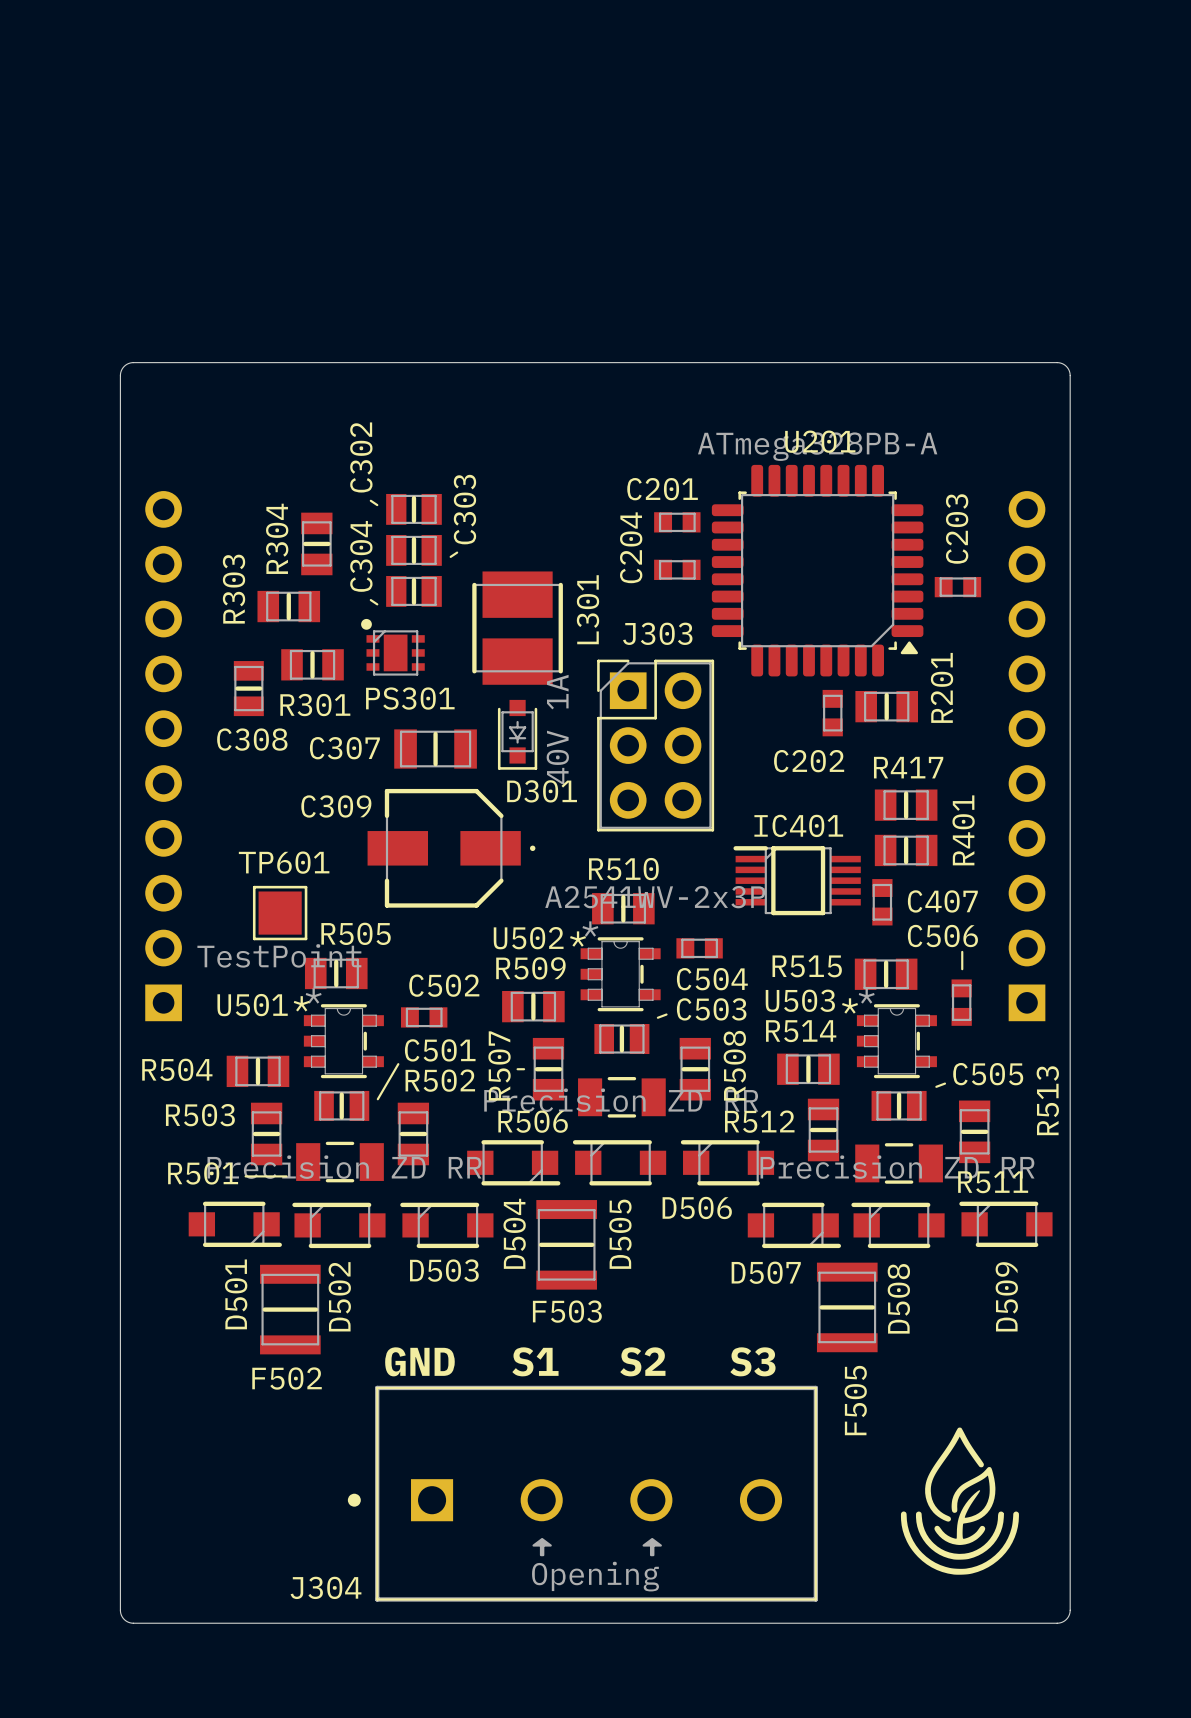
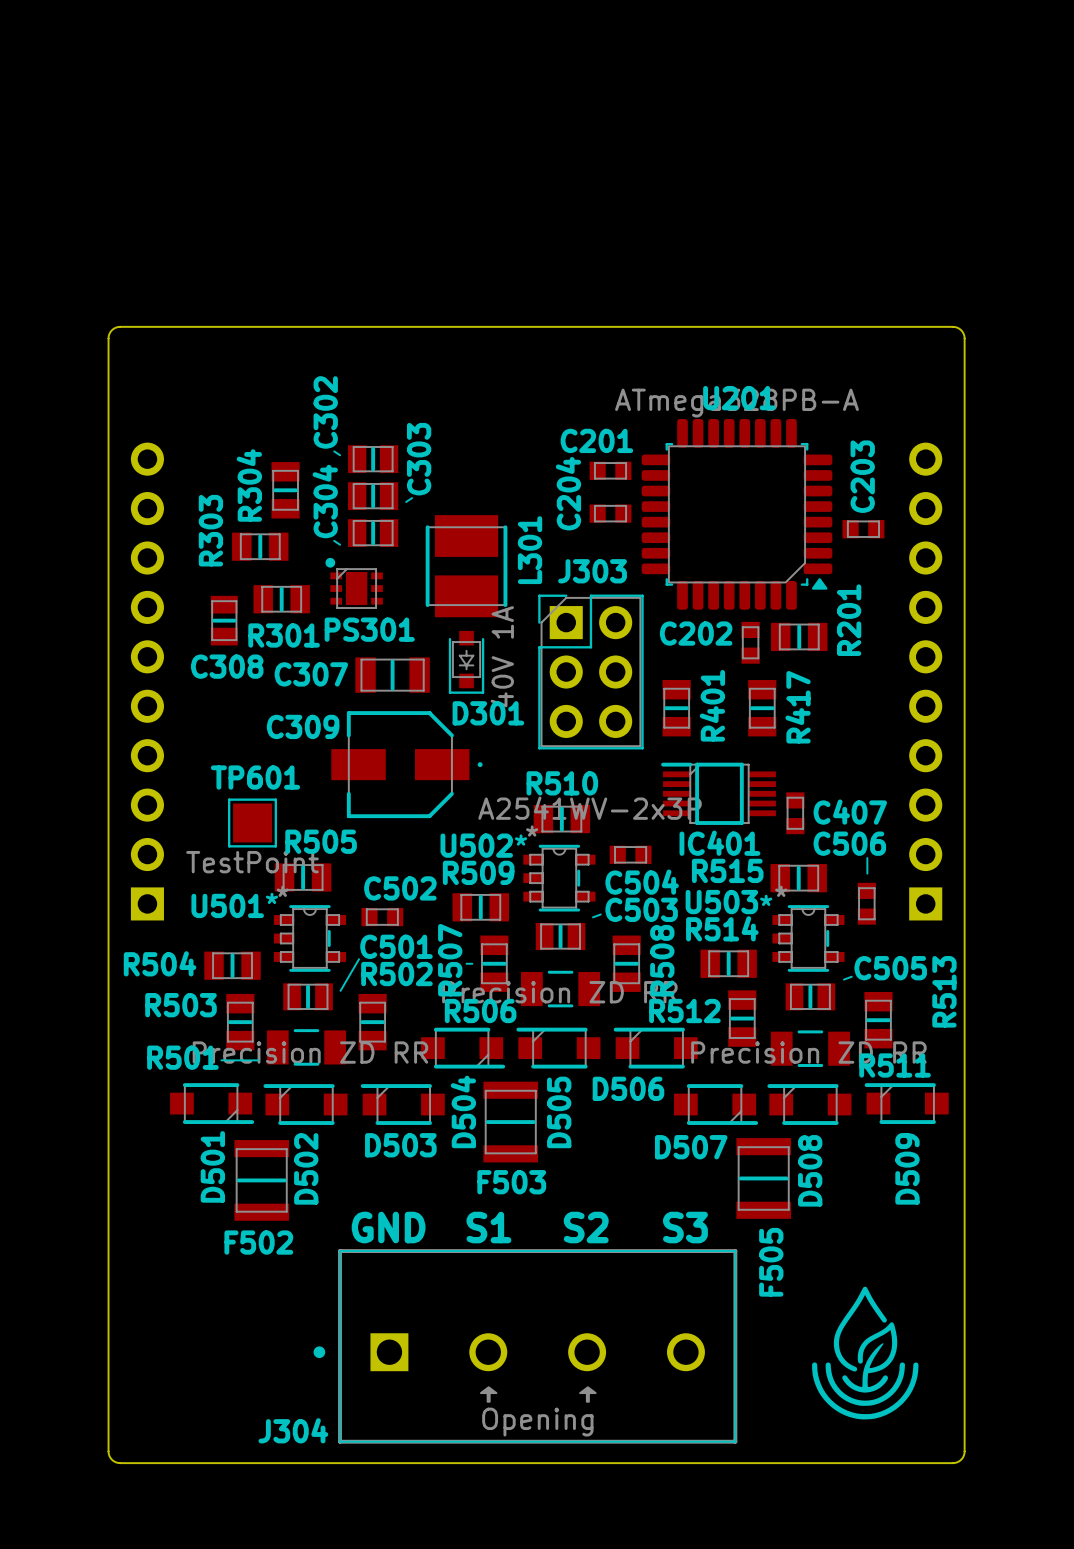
C202 name position: C202 (809, 761) -> C202 (696, 633)
R417 rotation: 0° (906, 805) -> 90° clockwise (762, 708)
R417 position: (906, 805) -> (762, 708)
IC401 name position: IC401 (798, 825) -> IC401 (719, 843)
R401 rotation: 0° (906, 850) -> 90° clockwise (676, 708)
R401 position: (906, 850) -> (676, 708)

